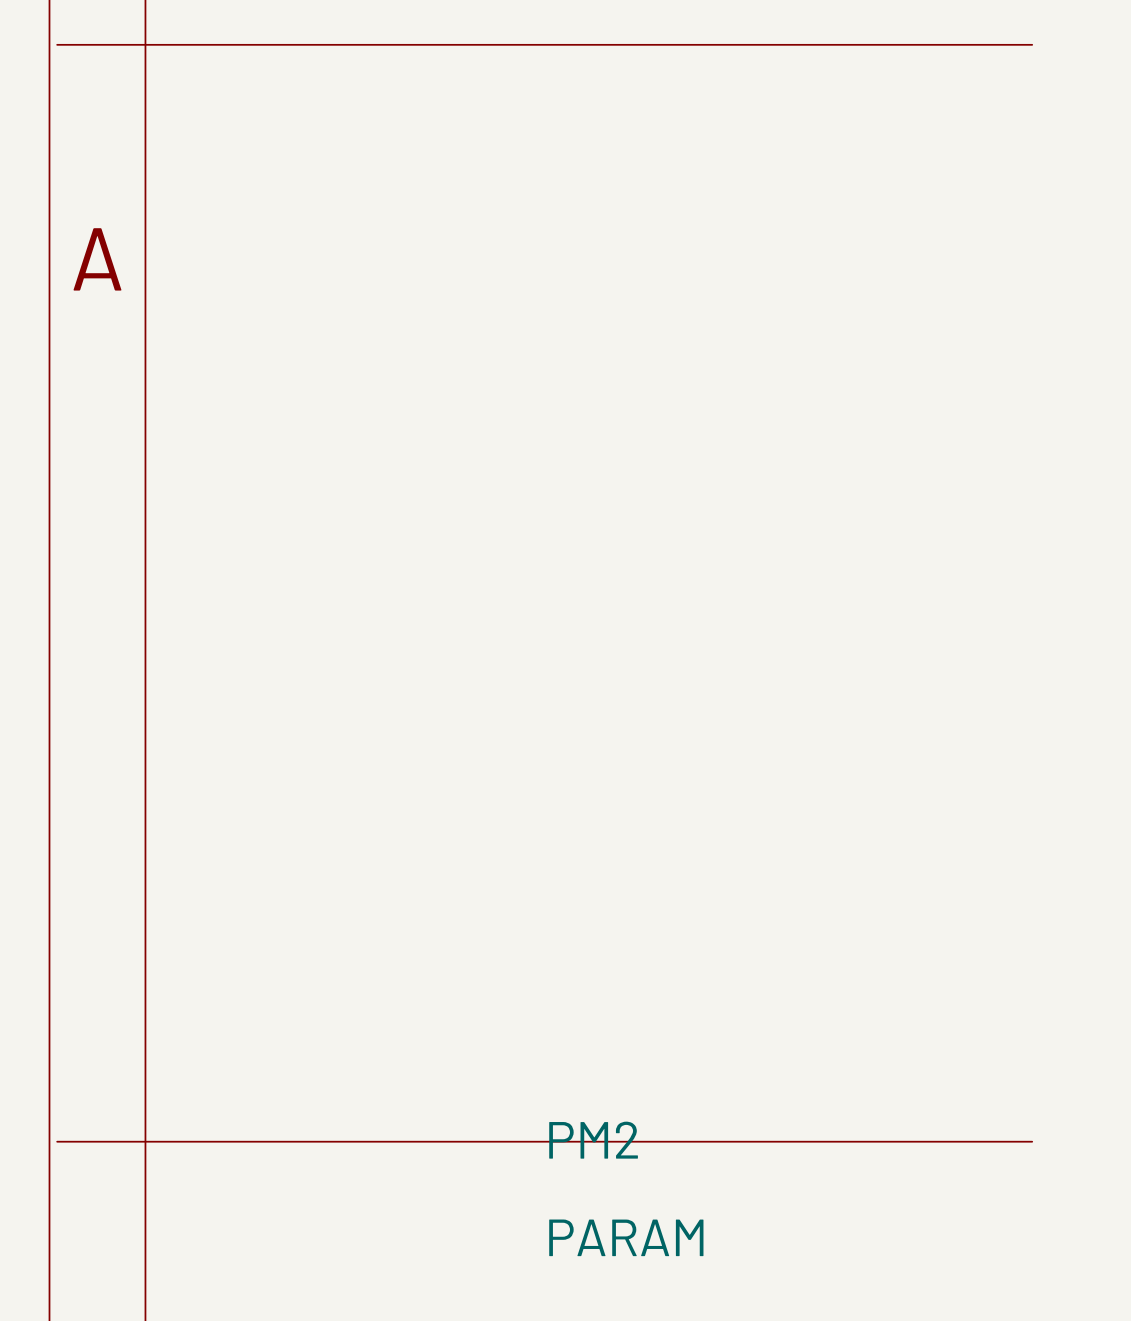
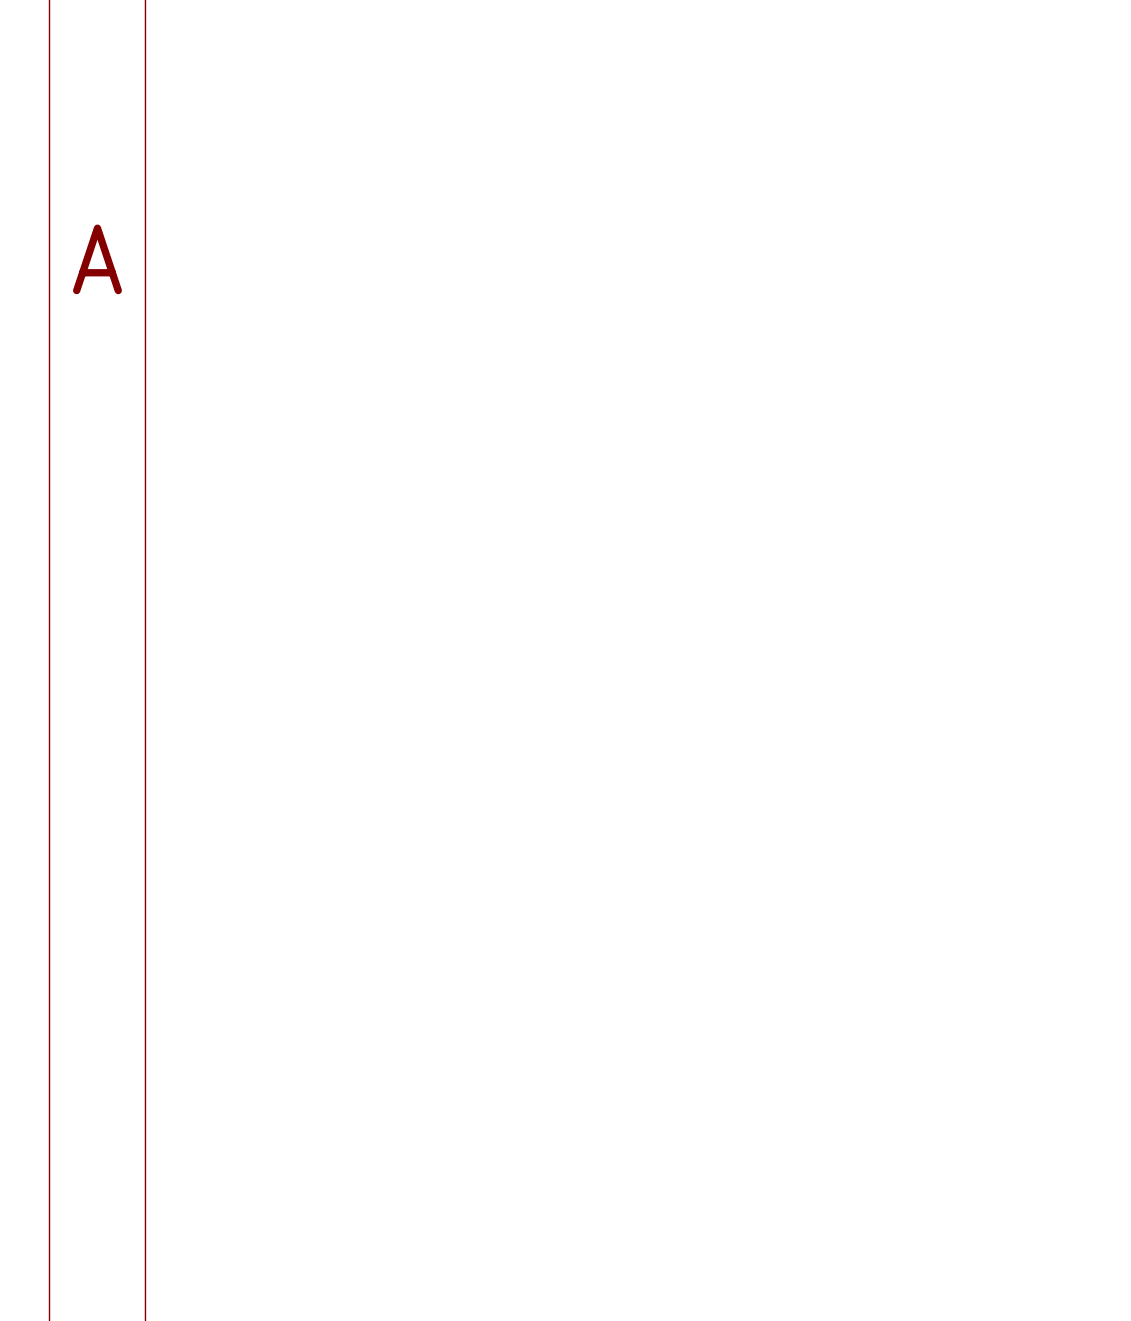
part: (544, 44) -> none
PM2: PARAM (544, 1141) -> none

